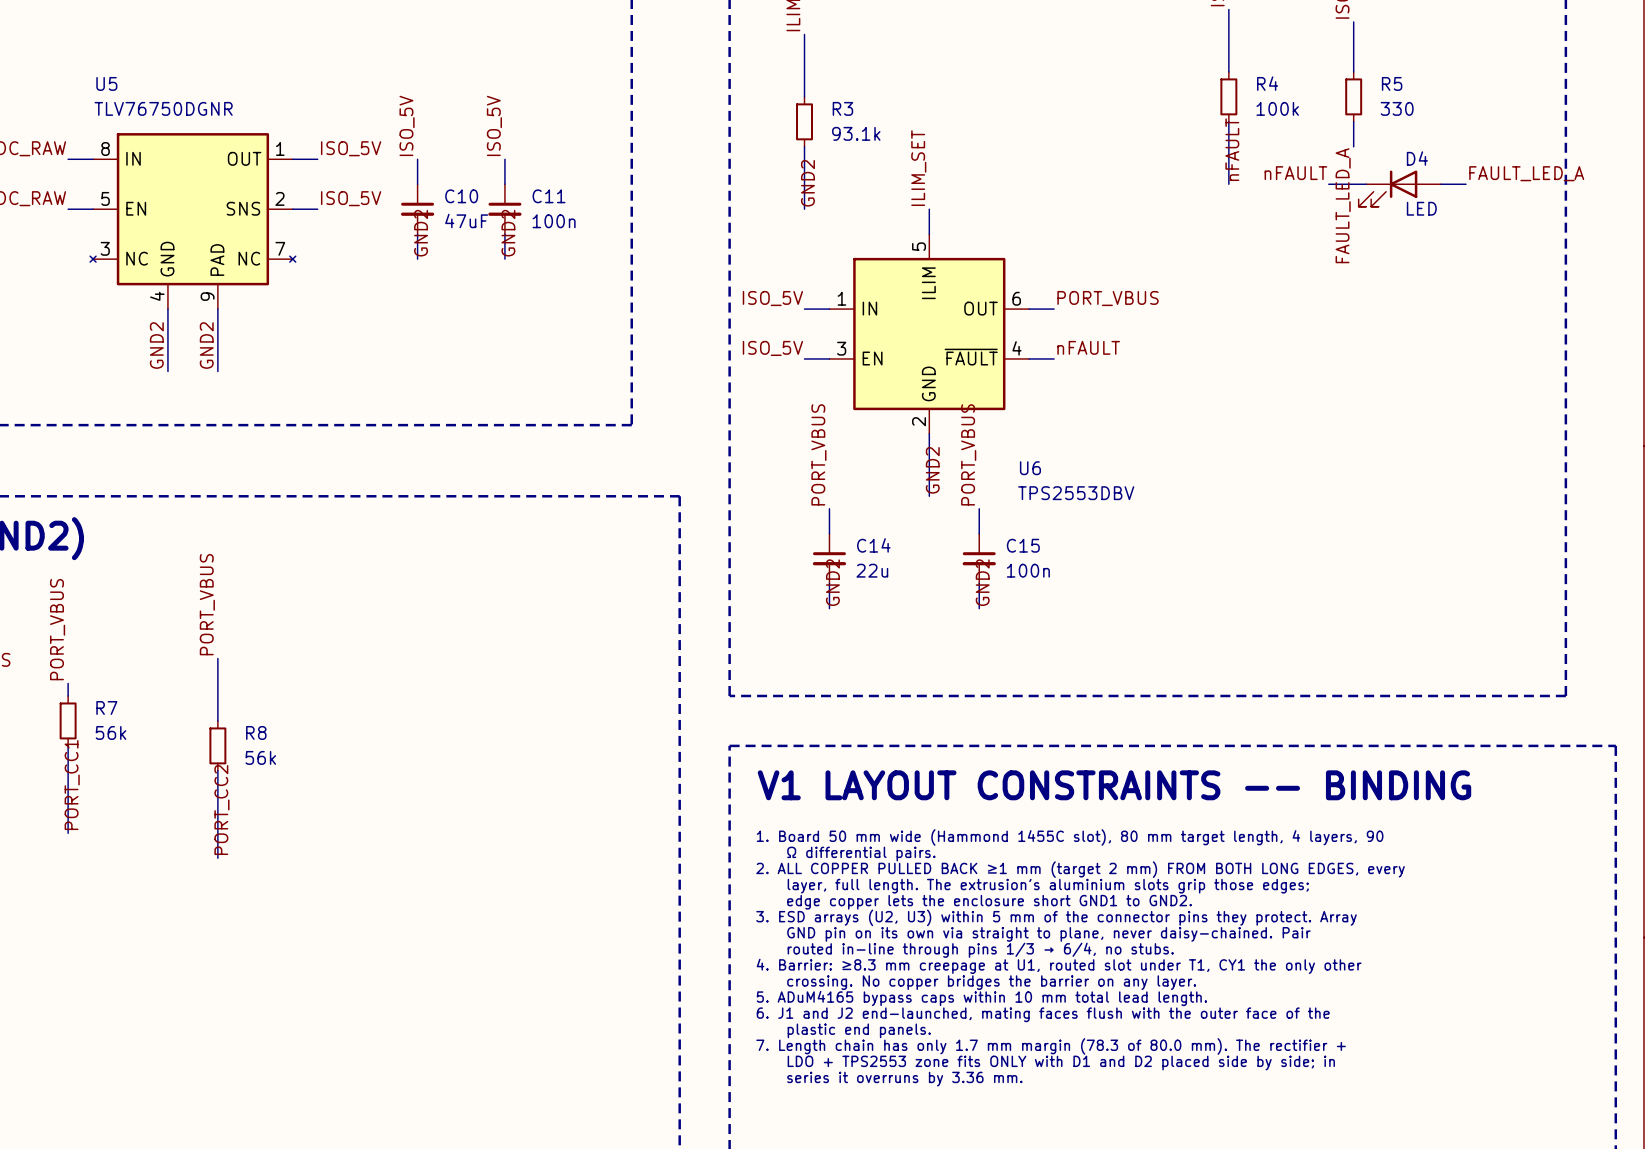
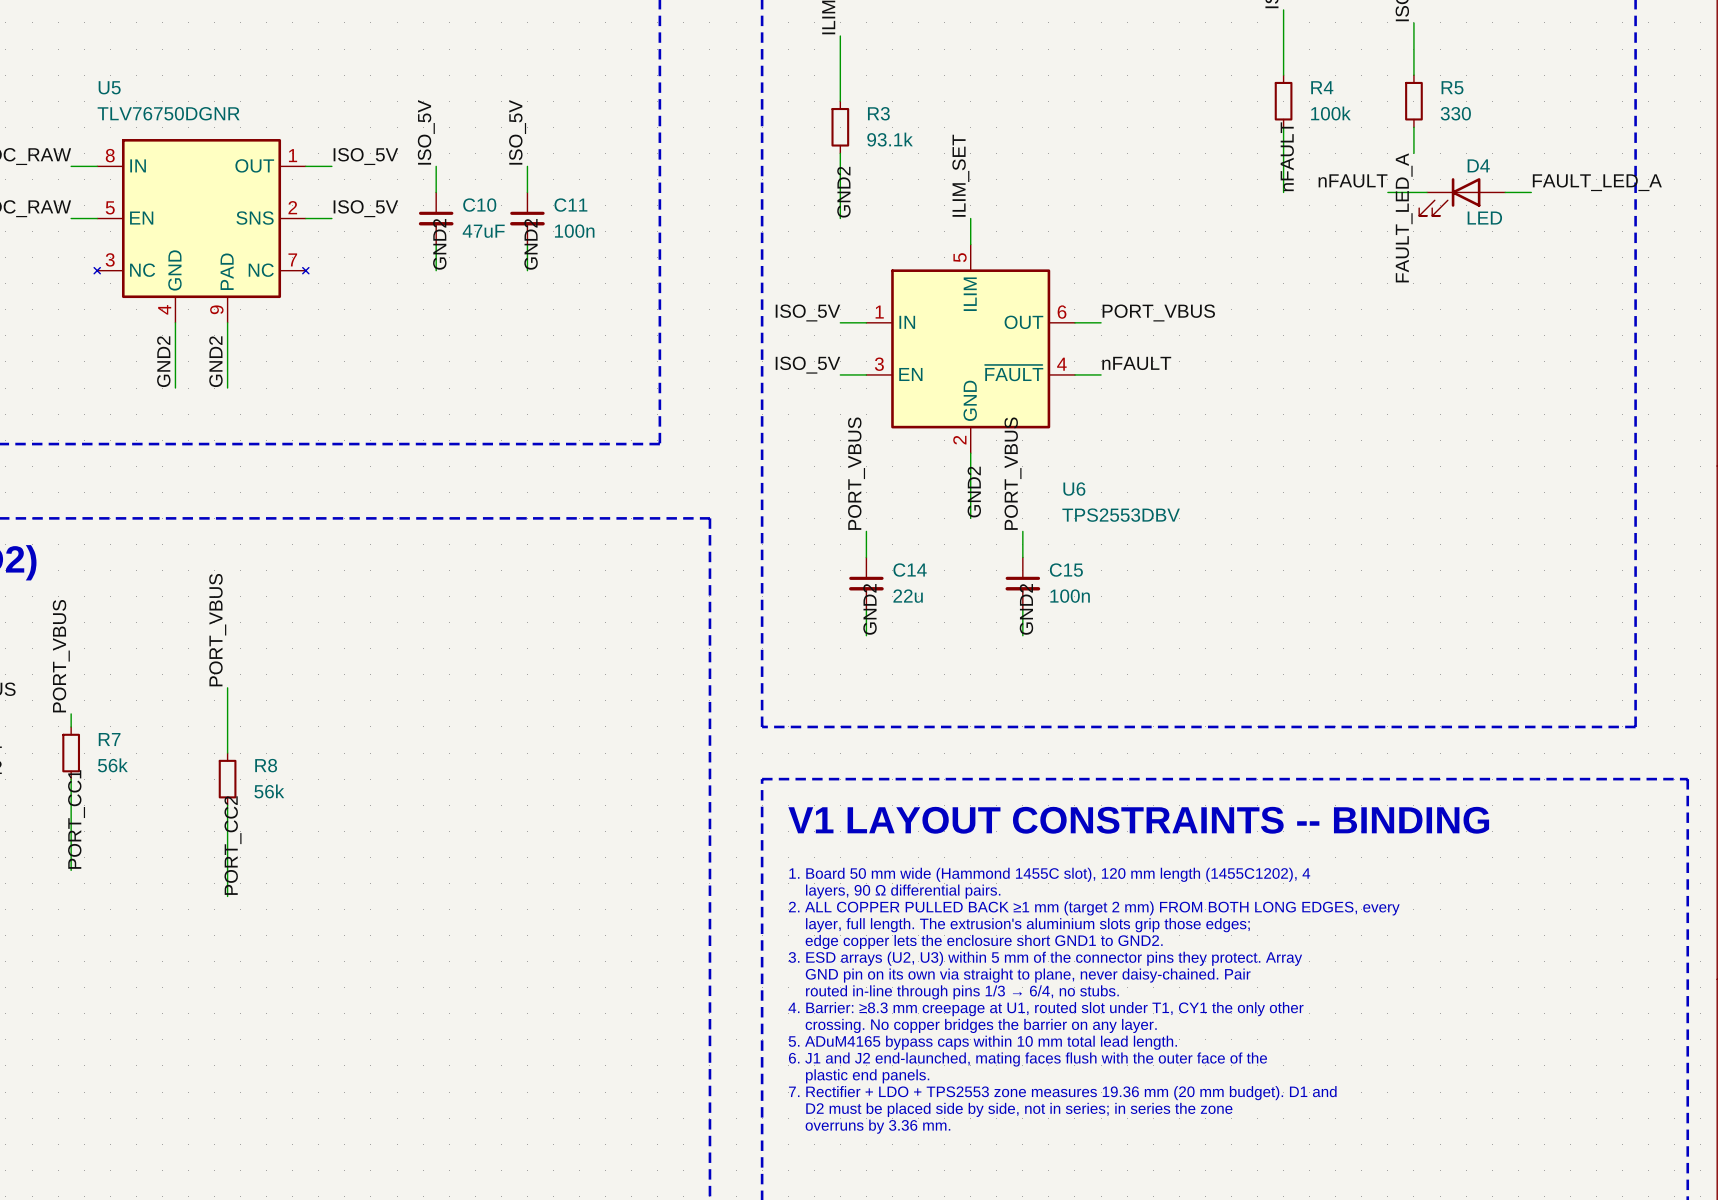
text: 1. Board 50 mm wide (Hammond 1455C slot), 80 mm target length, 4 layers, 90 (1070, 837) -> 1. Board 50 mm wide (Hammond 1455C slot), 120 mm length (1455C1202), 4 (1049, 874)
text: Ω differential pairs. (861, 854) -> layers, 90 Ω differential pairs. (903, 891)
text: 7. Length chain has only 1.7 mm margin (78.3 of 80.0 mm). The rectifier + (1051, 1046) -> 7. Rectifier + LDO + TPS2553 zone measures 19.36 mm (20 mm budget). D1 and (1062, 1093)
text: LDO + TPS2553 zone fits ONLY with D1 and D2 placed side by side; in (1061, 1063) -> D2 must be placed side by side, not in series; in series the zone (1019, 1109)
text: series it overruns by 3.36 mm. (904, 1079) -> overruns by 3.36 mm. (877, 1126)

